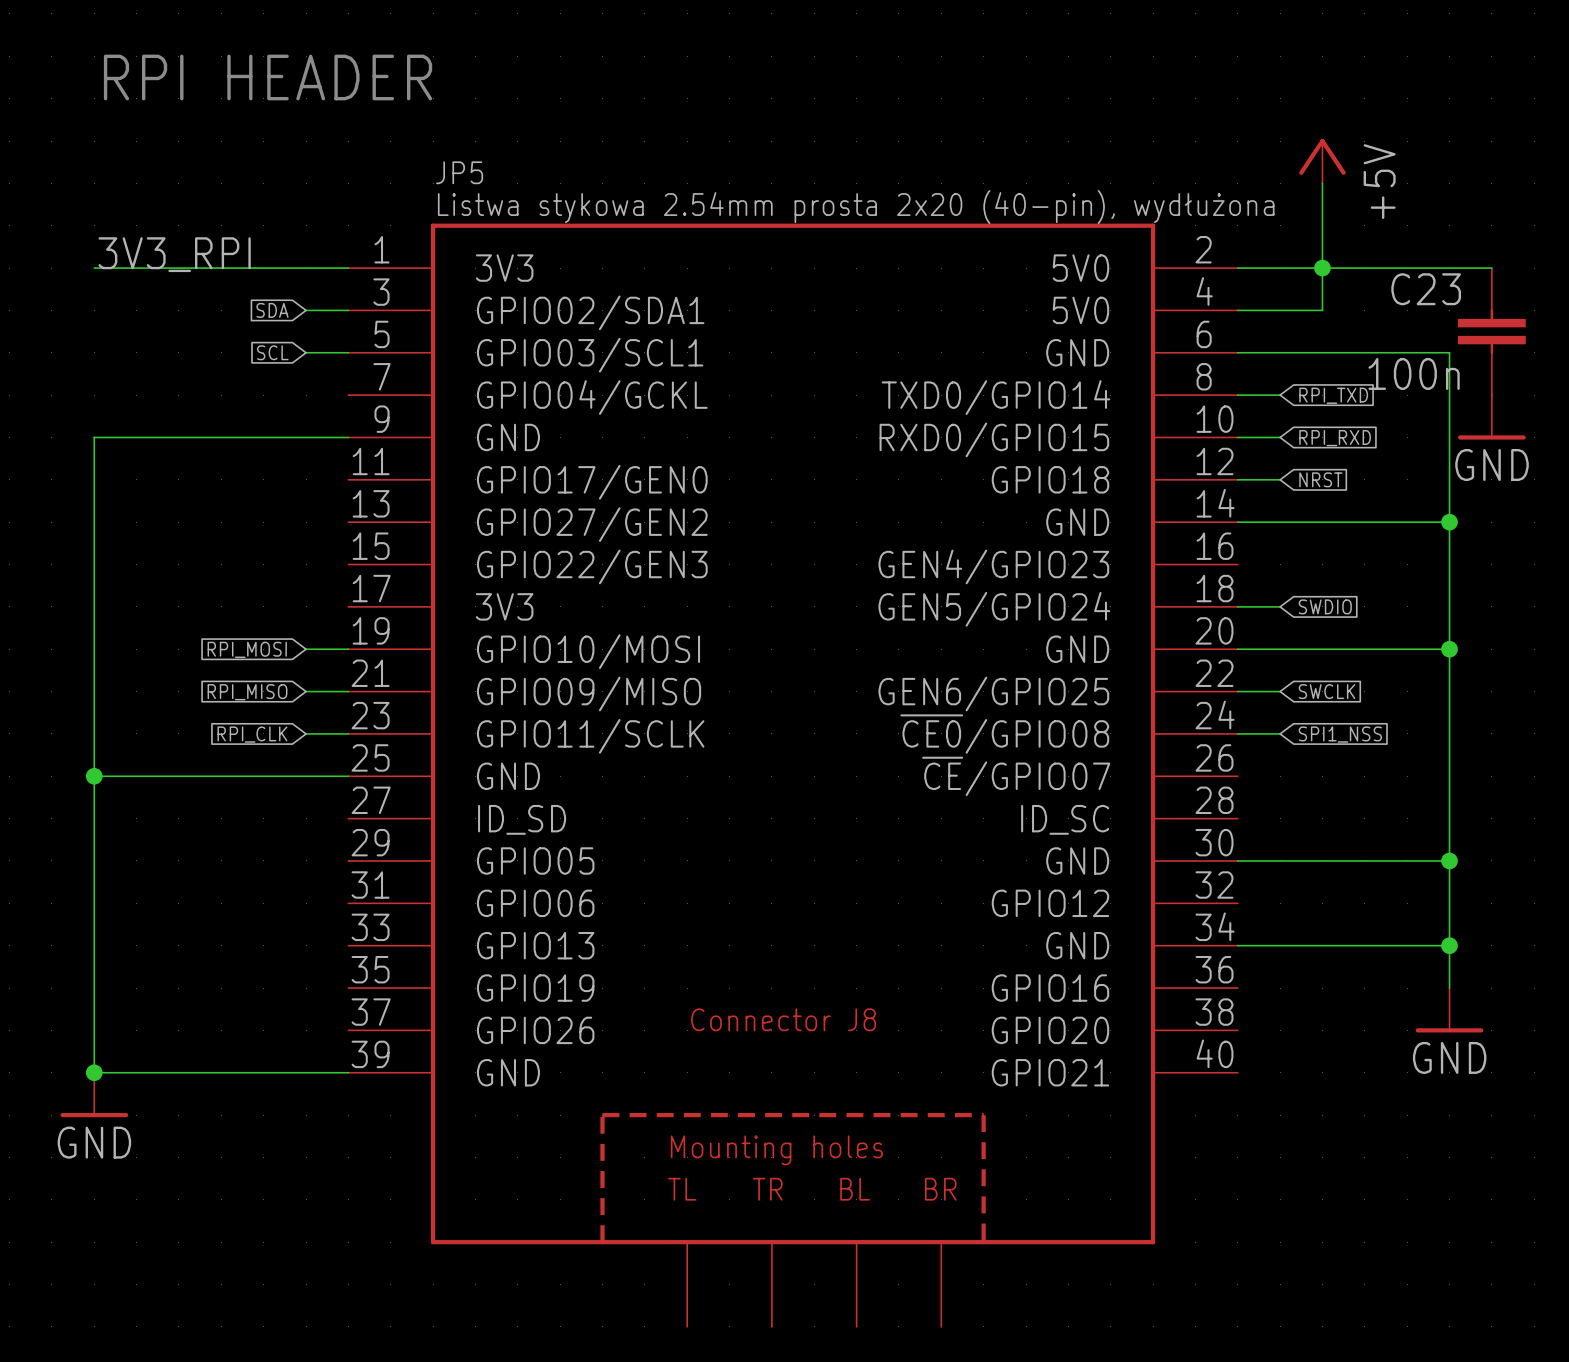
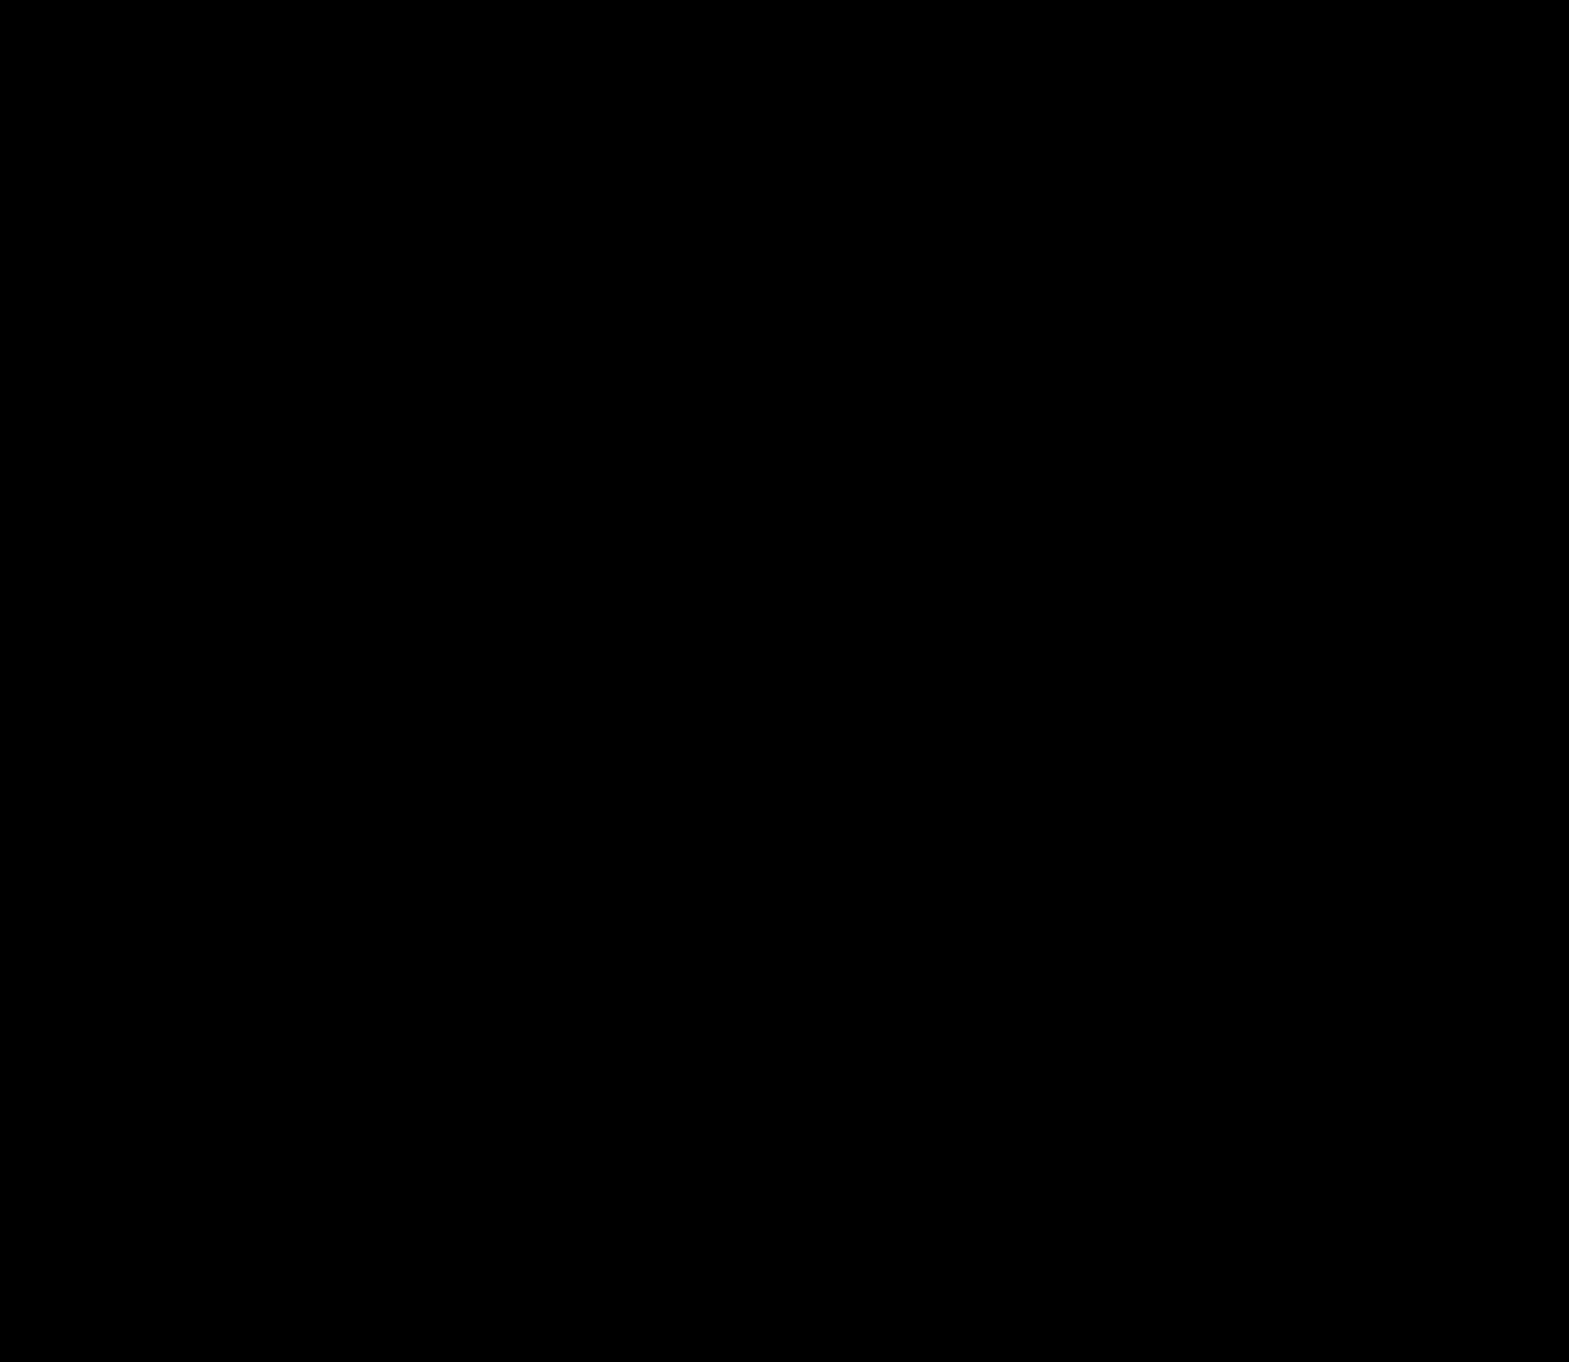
text: RPI HEADER (268, 77) -> none
power symbol: +5V (1322, 161) -> none
wire: (1322, 183) (1322, 310) (1237, 310) -> none
label: 3V3_RPI (174, 254) -> none
wire: (94, 268) (348, 268) -> none
wire: (1237, 268) (1491, 268) -> none
junction: (1322, 268) -> none
global label: SDA (272, 310) -> none
wire: (306, 310) (348, 310) -> none
C23: 100n (1491, 331) -> none
global label: SCL (272, 352) -> none
wire: (306, 352) (348, 352) -> none
wire: (1237, 352) (1449, 352) (1449, 988) -> none
wire: (1237, 395) (1280, 395) -> none
global label: RPI_TXD (1333, 395) -> none
power symbol: GND (1491, 417) -> none
wire: (348, 437) (94, 437) (94, 1072) (348, 1072) -> none
wire: (1237, 437) (1280, 437) -> none
global label: RPI_RXD (1335, 438) -> none
wire: (1237, 479) (1280, 479) -> none
global label: NRST (1320, 479) -> none
wire: (1237, 522) (1449, 522) -> none
junction: (1449, 522) -> none
wire: (1237, 606) (1280, 606) -> none
global label: SWDIO (1325, 606) -> none
global label: RPI_MOSI (247, 649) -> none
wire: (306, 649) (348, 649) -> none
wire: (1237, 649) (1449, 649) -> none
junction: (1449, 649) -> none
wire: (306, 691) (348, 691) -> none
wire: (1237, 691) (1280, 691) -> none
global label: SWCLK (1327, 691) -> none
global label: RPI_MISO (247, 692) -> none
wire: (306, 733) (348, 733) -> none
wire: (1237, 733) (1280, 733) -> none
global label: RPI_CLK (252, 734) -> none
global label: SPI1_NSS (1340, 734) -> none
JP5: Listwa stykowa 2.54mm prosta 2x20 (40-pin), wydłużona (793, 775) -> none
wire: (94, 776) (348, 776) -> none
junction: (94, 776) -> none
wire: (1237, 860) (1449, 860) -> none
junction: (1449, 860) -> none
wire: (1237, 945) (1449, 945) -> none
junction: (1449, 945) -> none
power symbol: GND (1449, 1010) -> none
junction: (94, 1072) -> none
power symbol: GND (94, 1094) -> none

